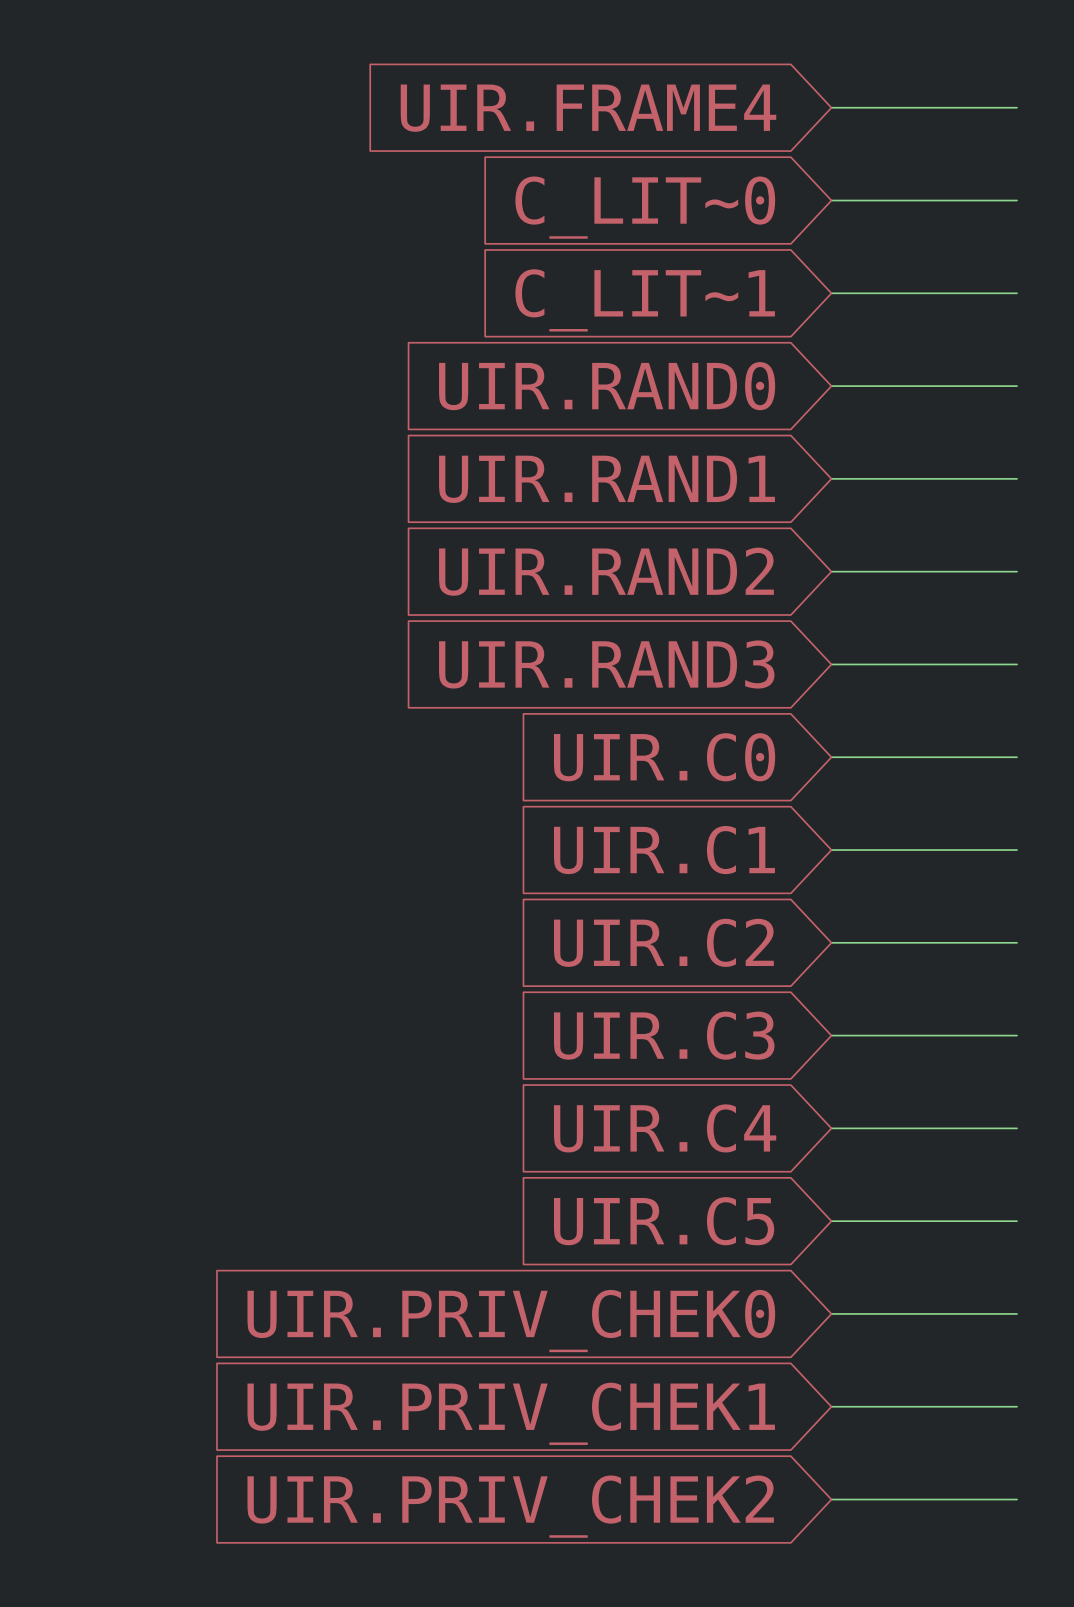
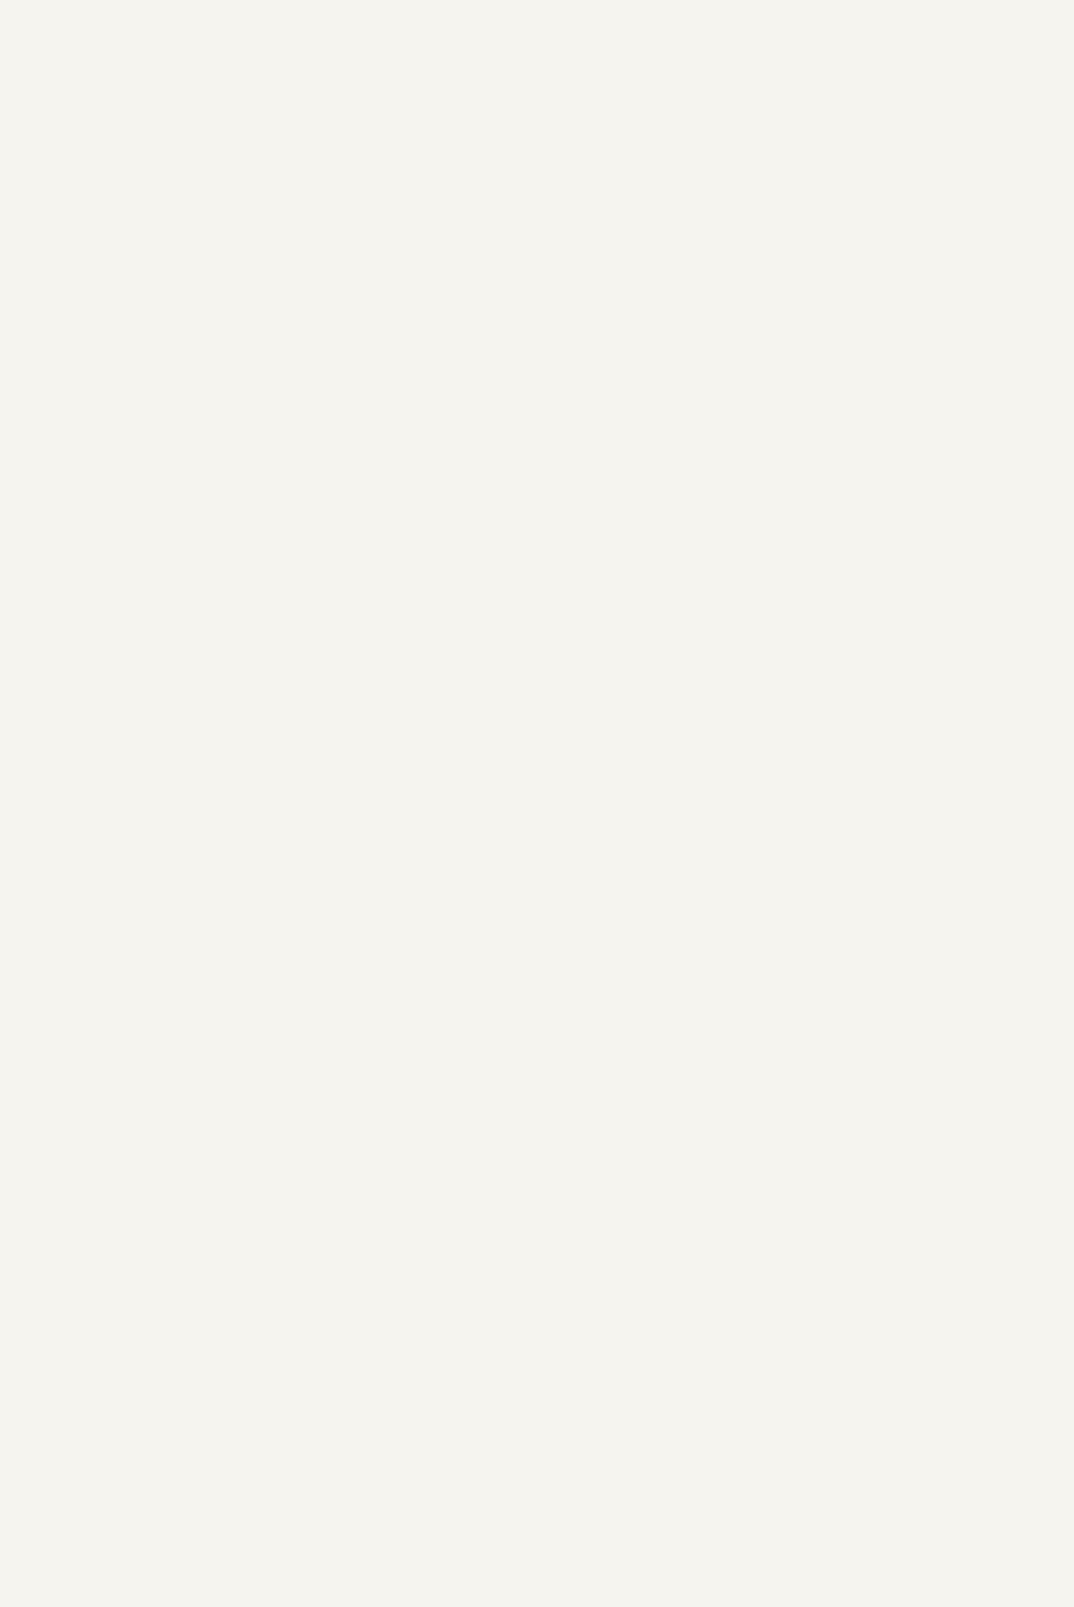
wire: (831, 107) (1017, 107) -> none
global label: UIR.FRAME4 (588, 108) -> none
wire: (831, 200) (1017, 200) -> none
global label: C_LIT~0 (645, 207) -> none
wire: (831, 293) (1017, 293) -> none
global label: C_LIT~1 (645, 300) -> none
global label: UIR.RAND0 (607, 386) -> none
wire: (831, 386) (1017, 386) -> none
wire: (831, 478) (1017, 478) -> none
global label: UIR.RAND1 (607, 479) -> none
global label: UIR.RAND2 (606, 571) -> none
wire: (831, 571) (1017, 571) -> none
global label: UIR.RAND3 (606, 664) -> none
wire: (831, 664) (1017, 664) -> none
global label: UIR.C0 (664, 757) -> none
wire: (831, 757) (1017, 757) -> none
global label: UIR.C1 (664, 850) -> none
wire: (831, 850) (1017, 850) -> none
global label: UIR.C2 (663, 942) -> none
wire: (831, 942) (1017, 942) -> none
global label: UIR.C3 (664, 1035) -> none
wire: (831, 1035) (1017, 1035) -> none
global label: UIR.C4 (665, 1128) -> none
wire: (831, 1128) (1017, 1128) -> none
global label: UIR.C5 (664, 1221) -> none
wire: (831, 1221) (1017, 1221) -> none
wire: (831, 1313) (1017, 1313) -> none
global label: UIR.PRIV_CHEK0 (511, 1321) -> none
wire: (831, 1406) (1017, 1406) -> none
global label: UIR.PRIV_CHEK1 (511, 1413) -> none
wire: (831, 1499) (1017, 1499) -> none
global label: UIR.PRIV_CHEK2 (510, 1506) -> none

